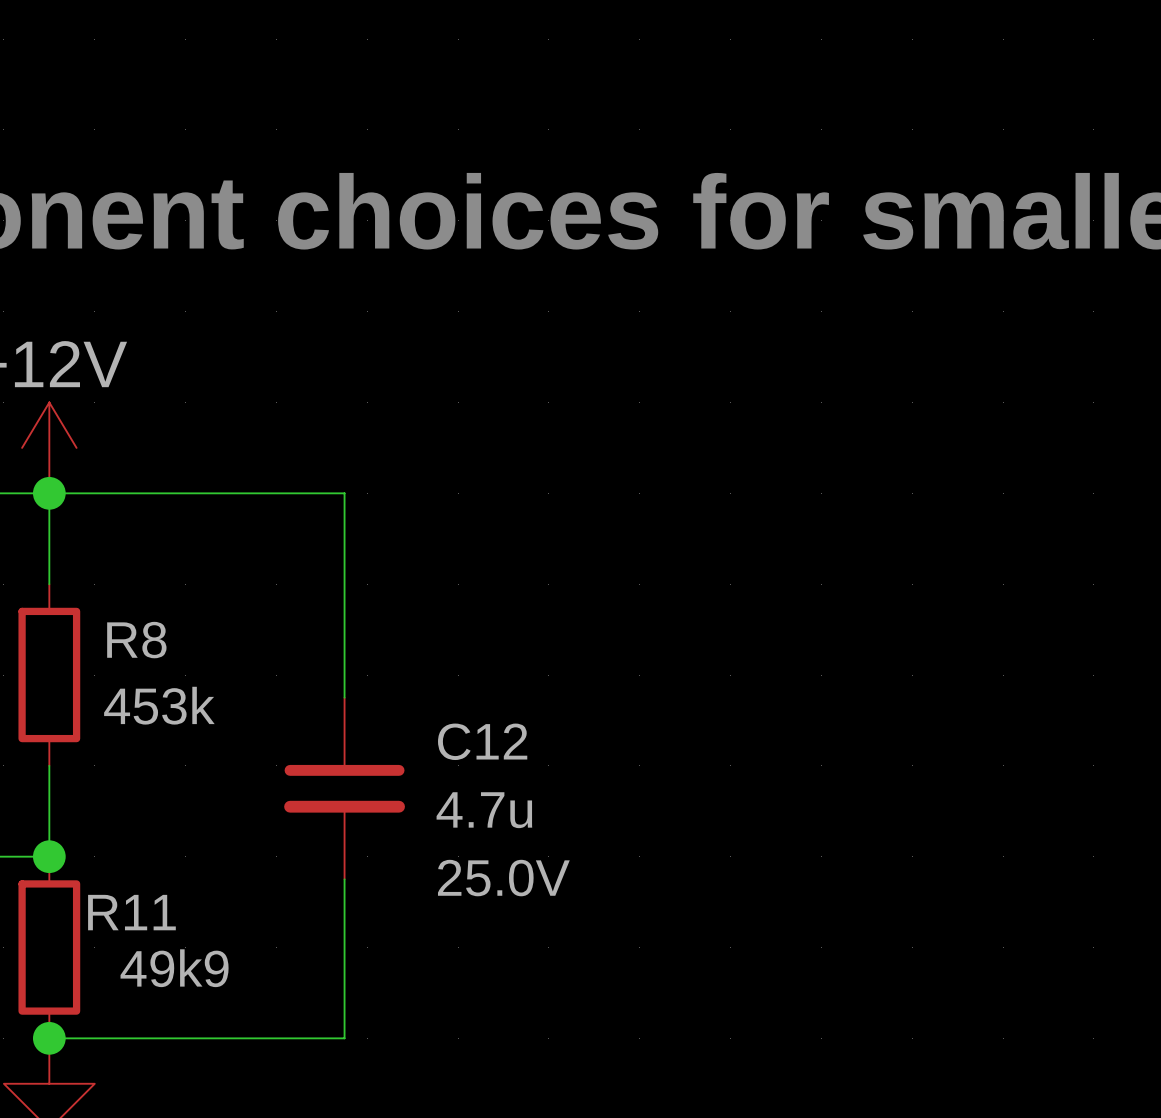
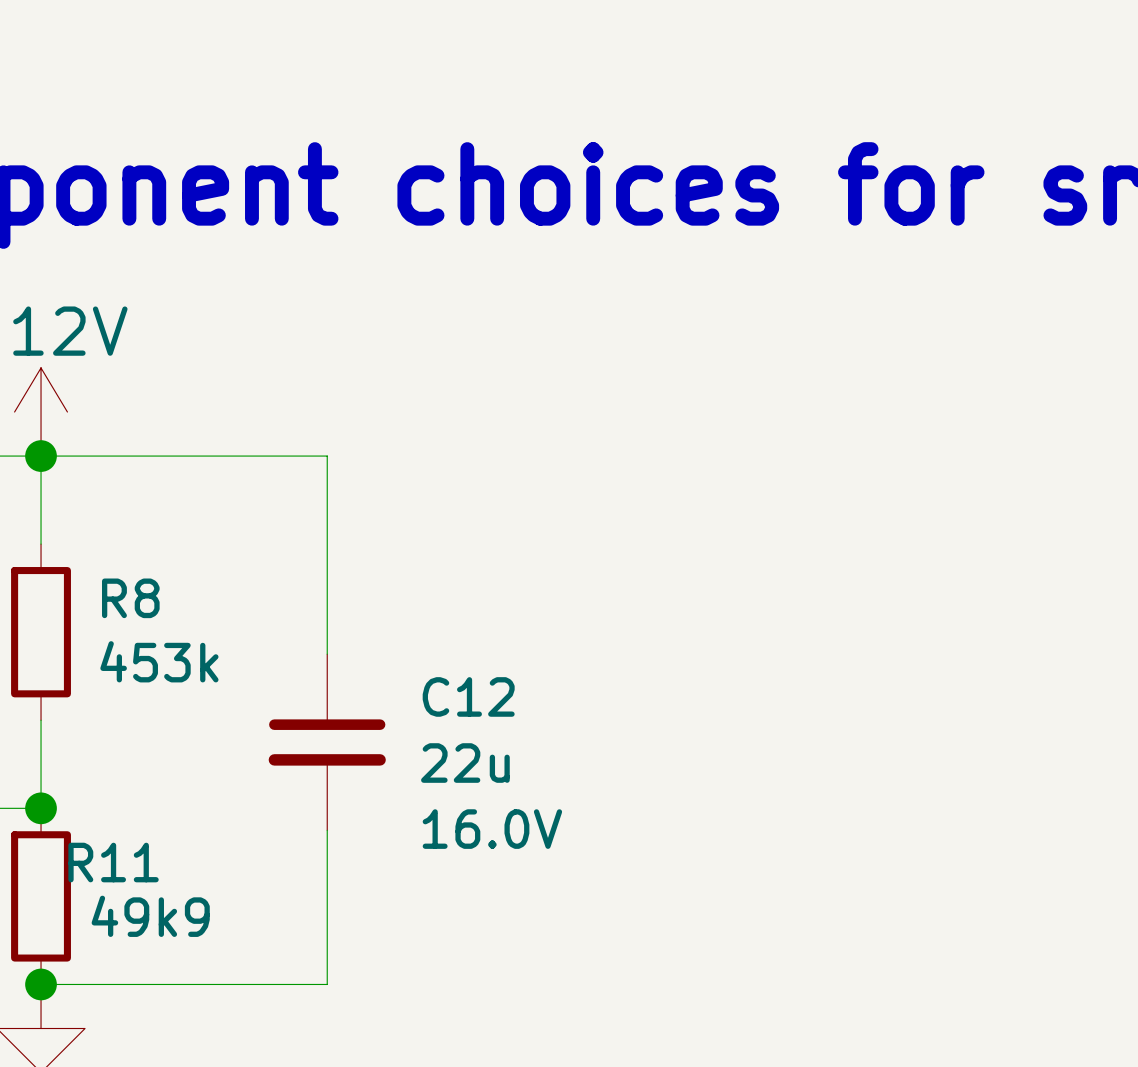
C12 value: 4.7u (484, 810) -> 22u (465, 763)
C12 text: 25.0V (503, 878) -> 16.0V (492, 829)

